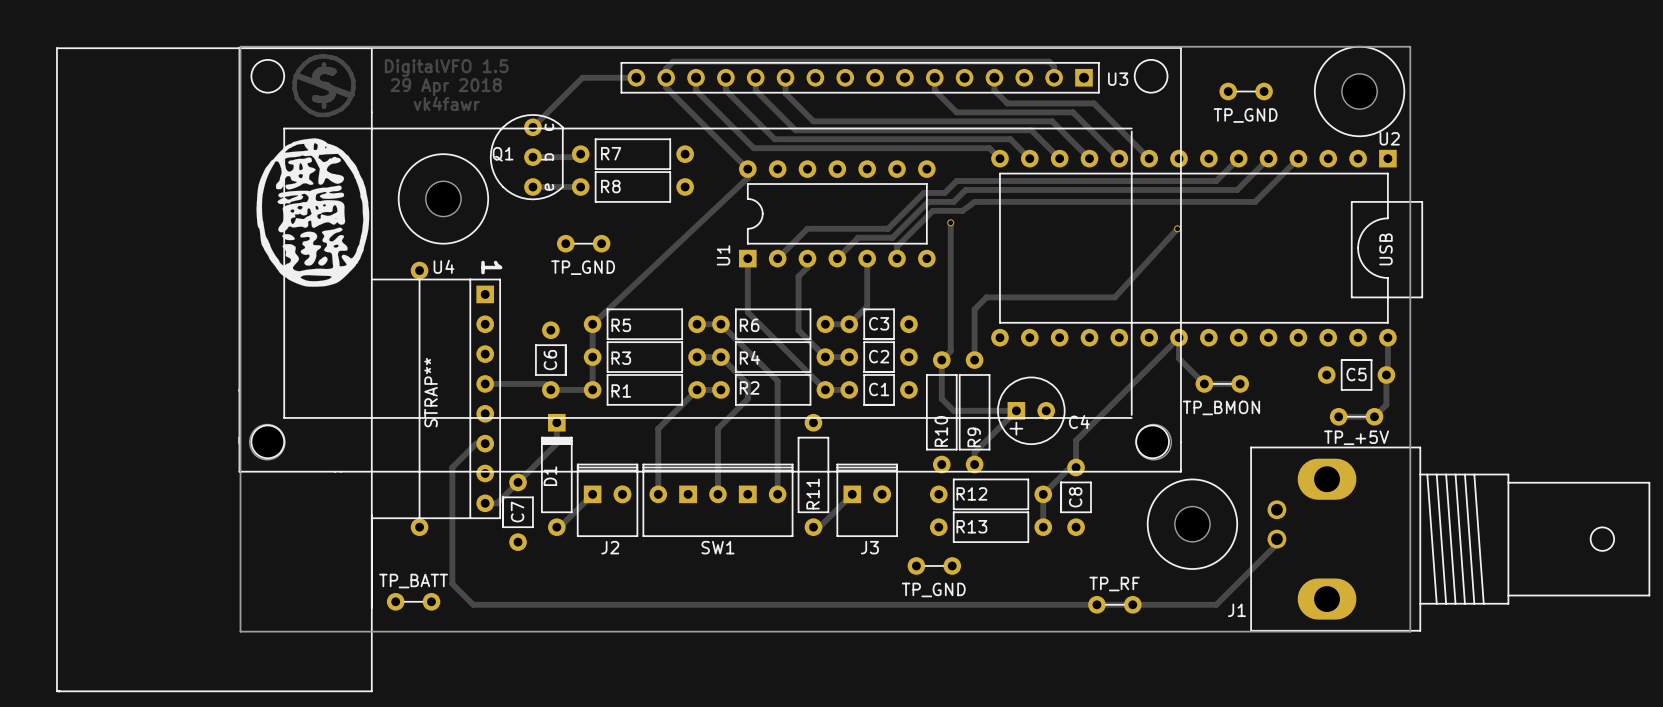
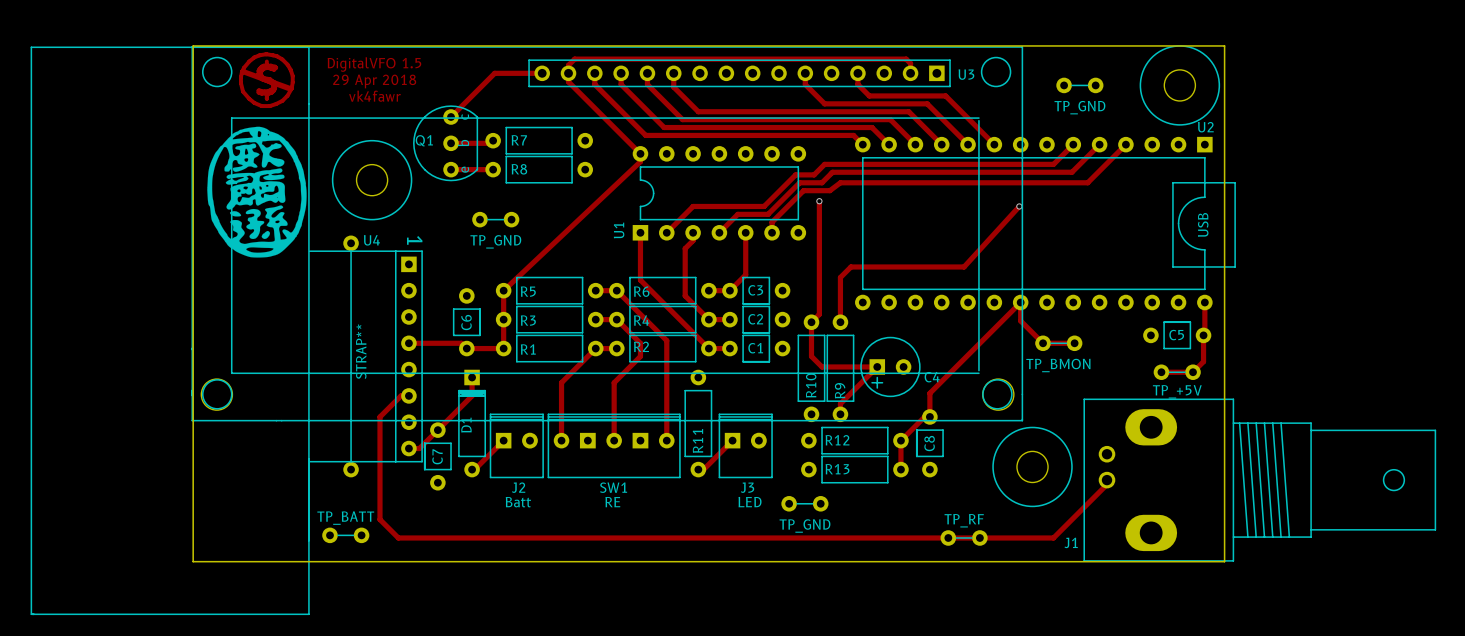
text: none -> Batt (518, 502)
text: none -> RE (612, 502)
text: none -> LED (750, 502)

